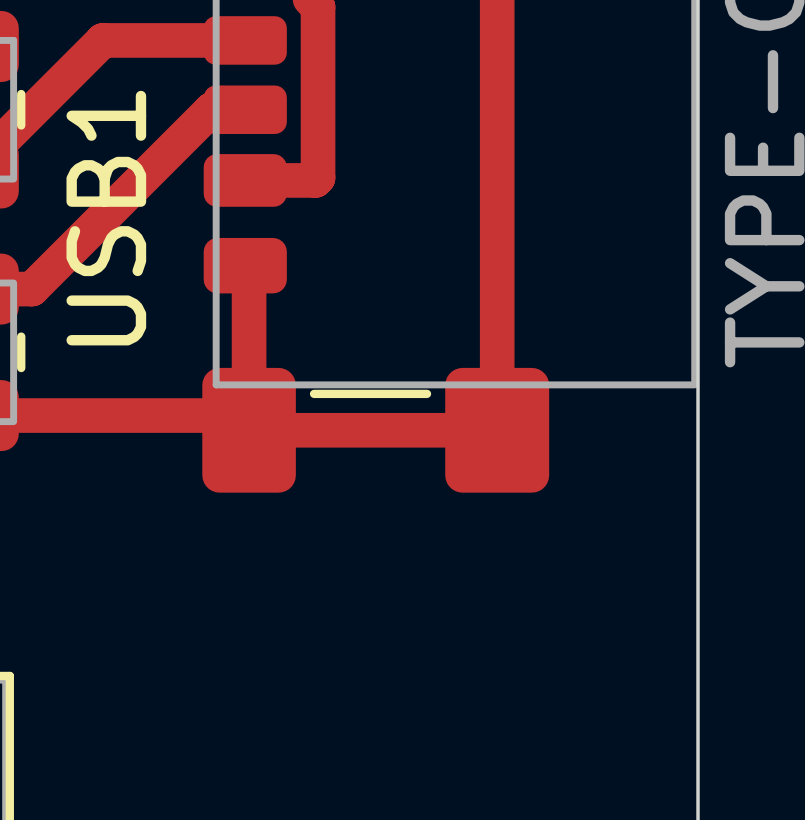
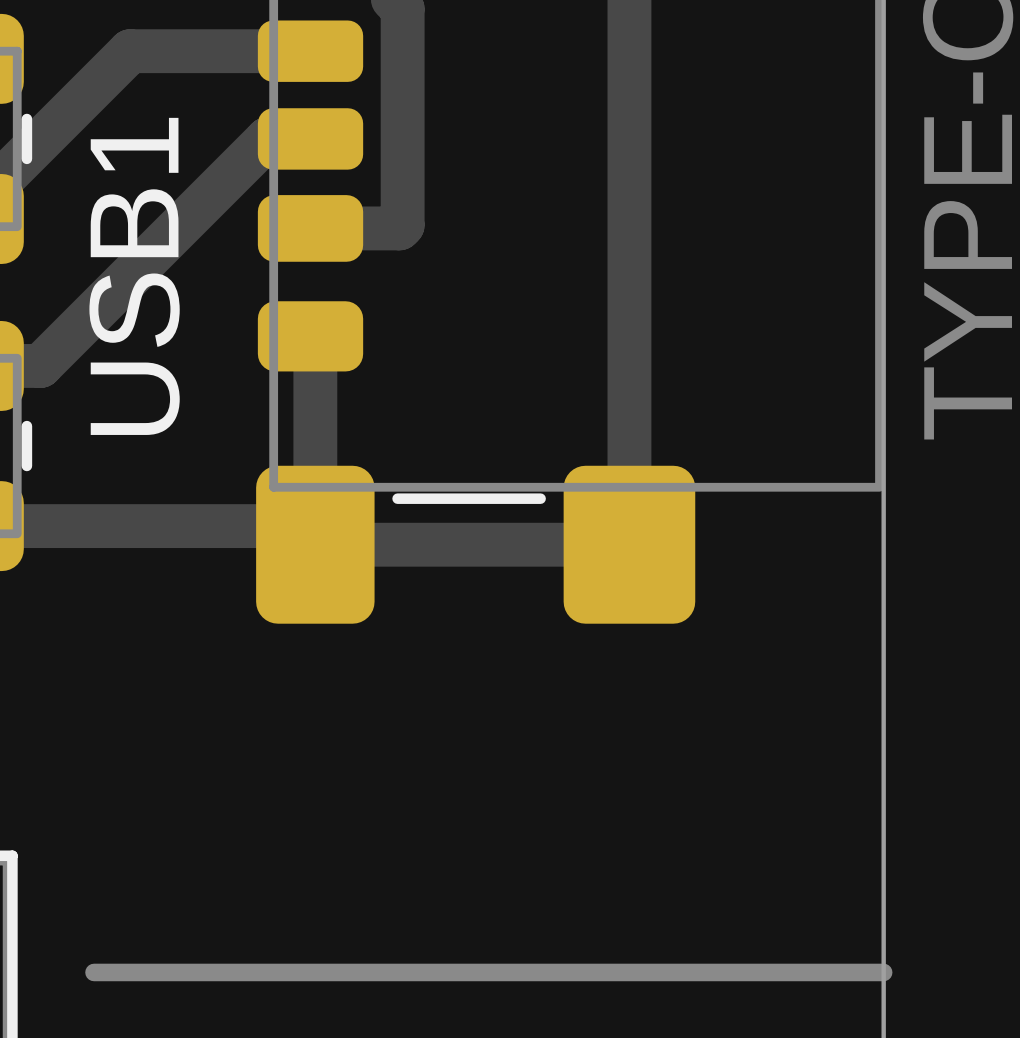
line: none -> (94, 972) (883, 972)

